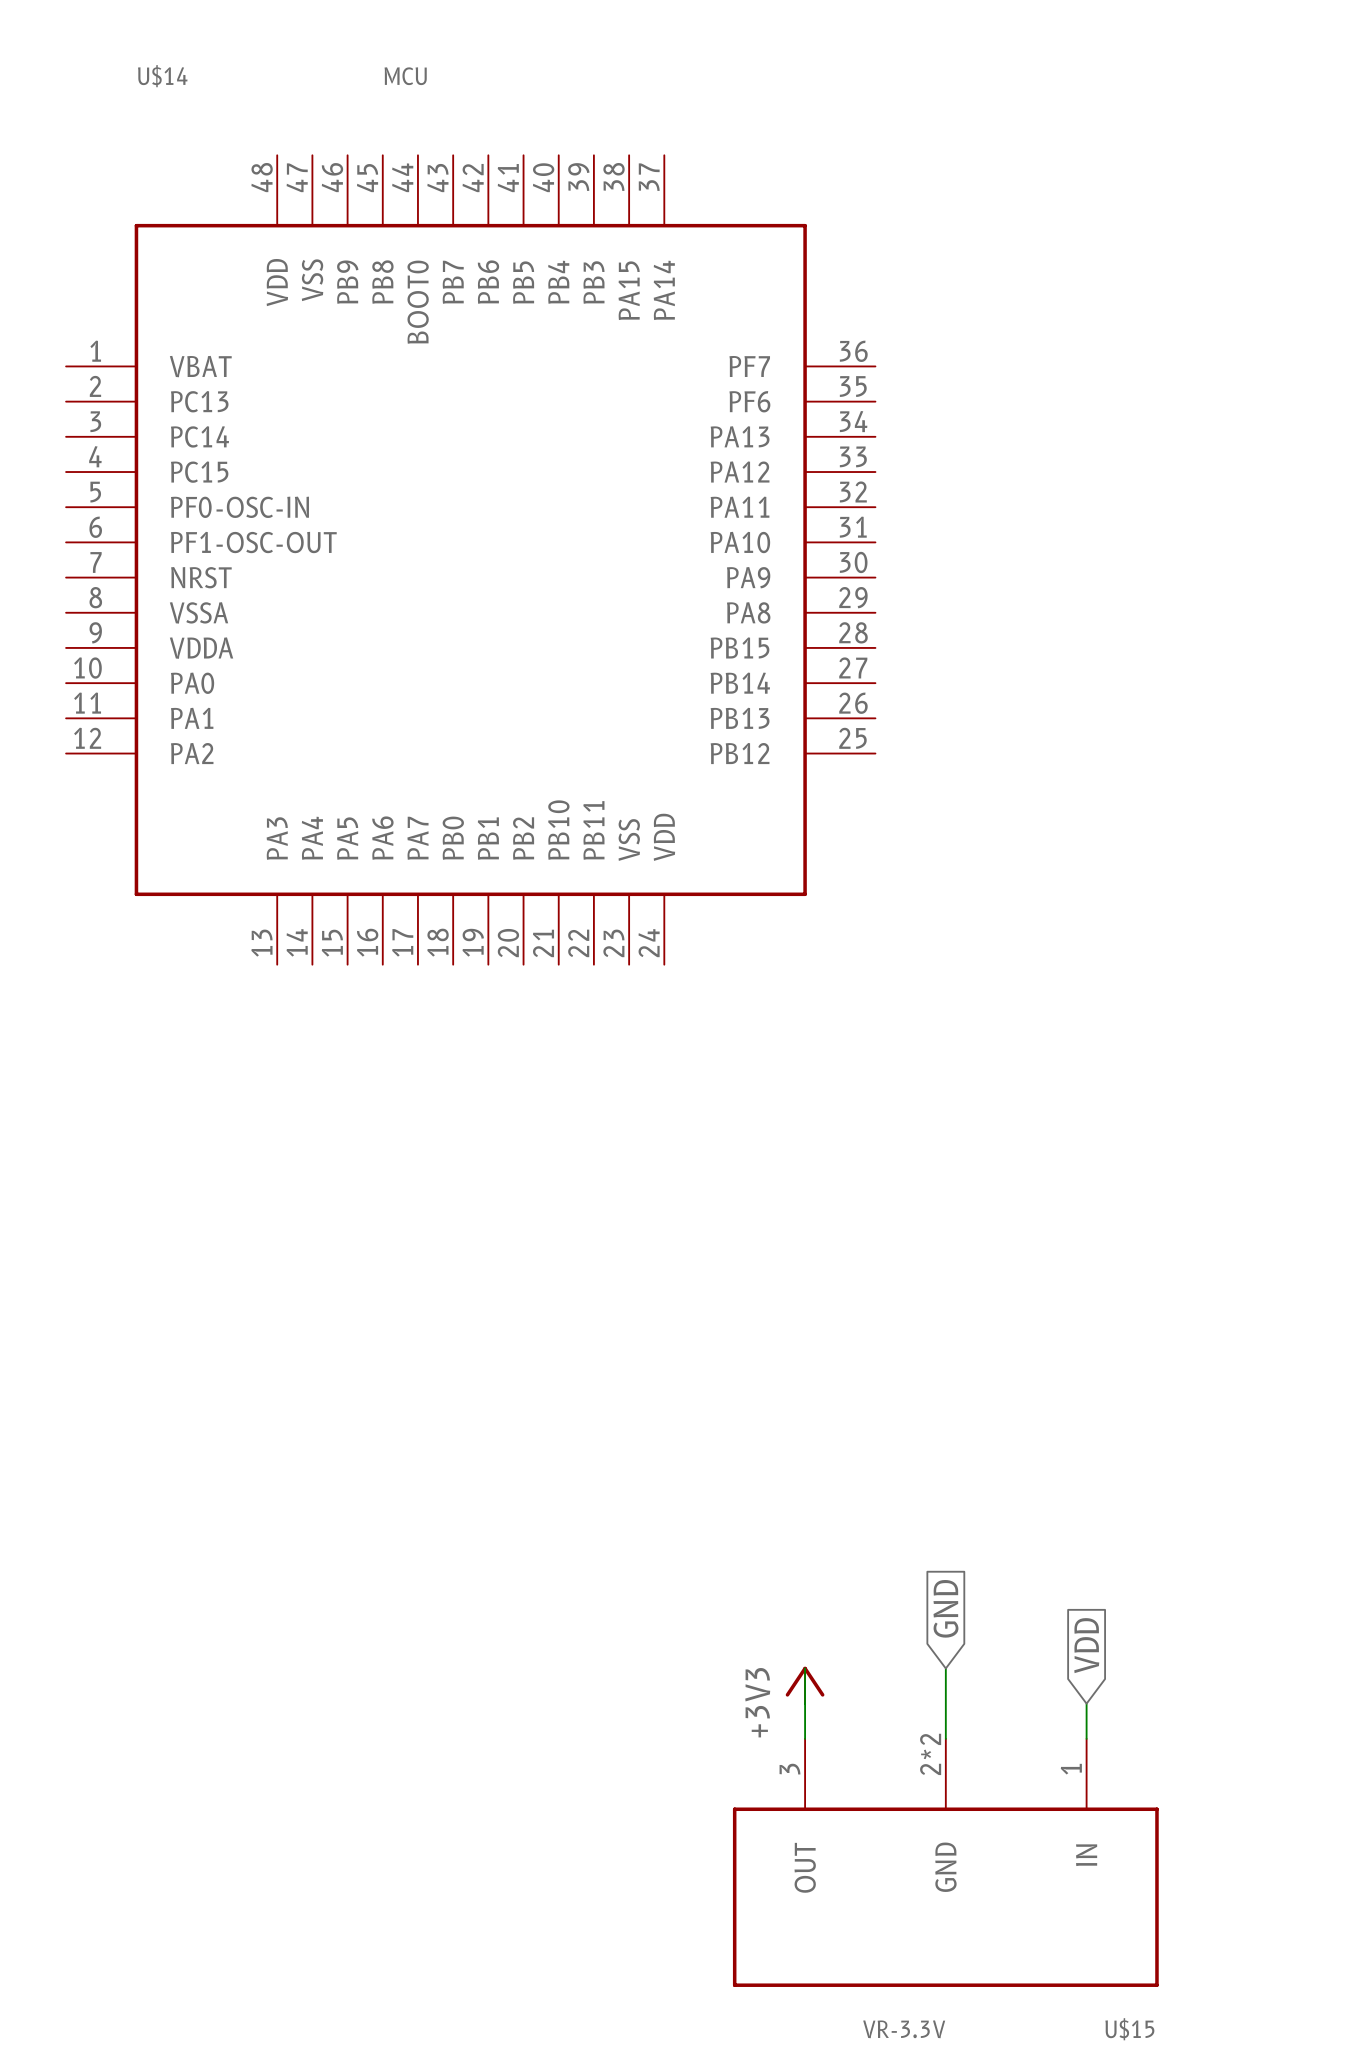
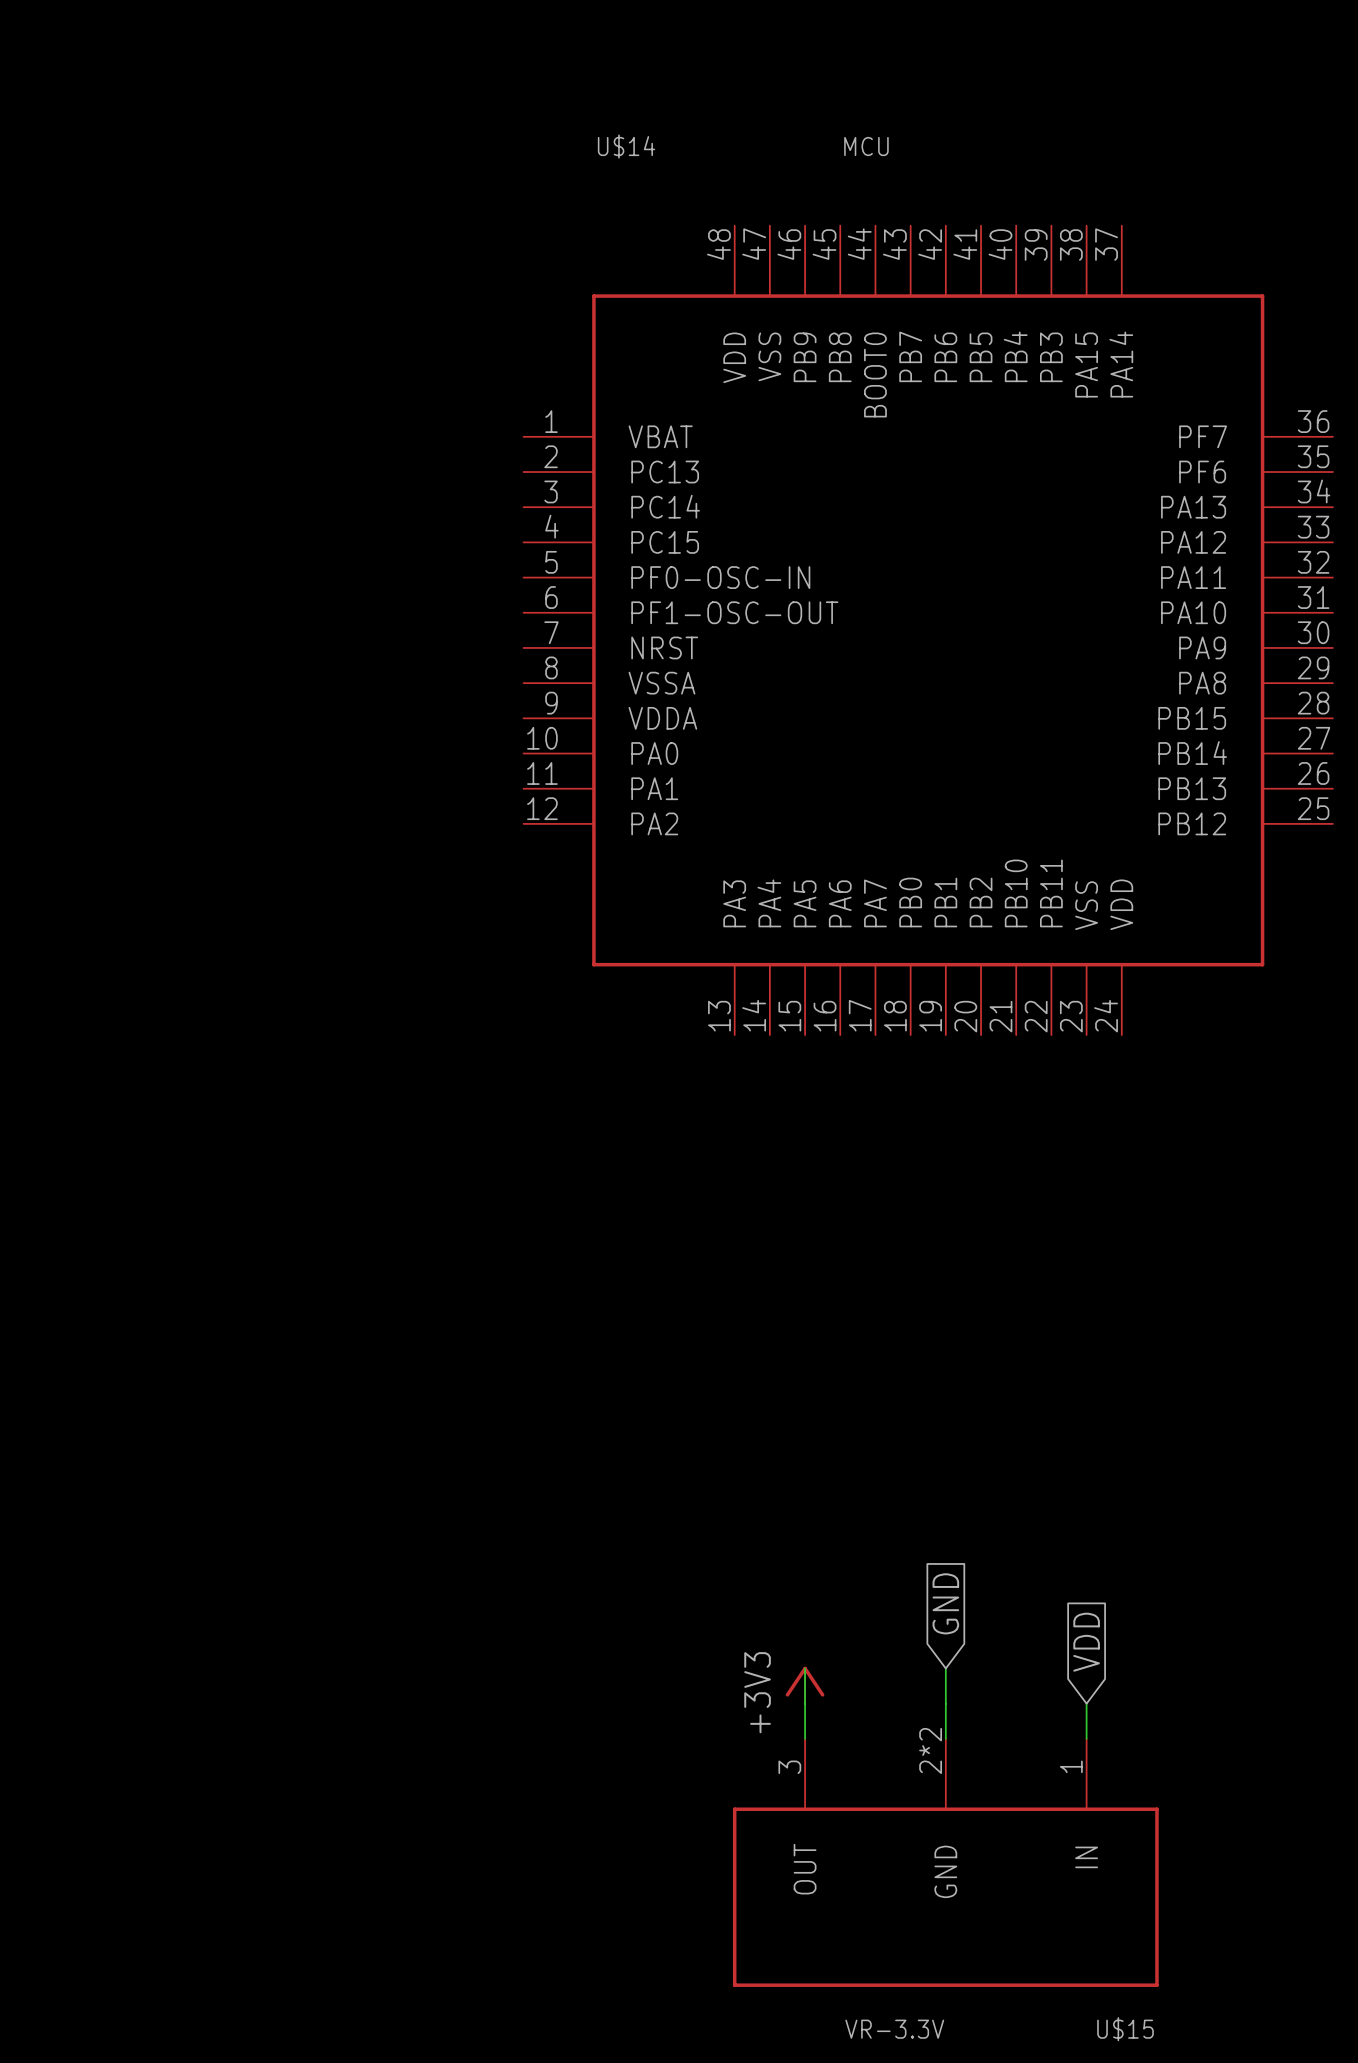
U$14 position: (470, 559) -> (928, 630)

